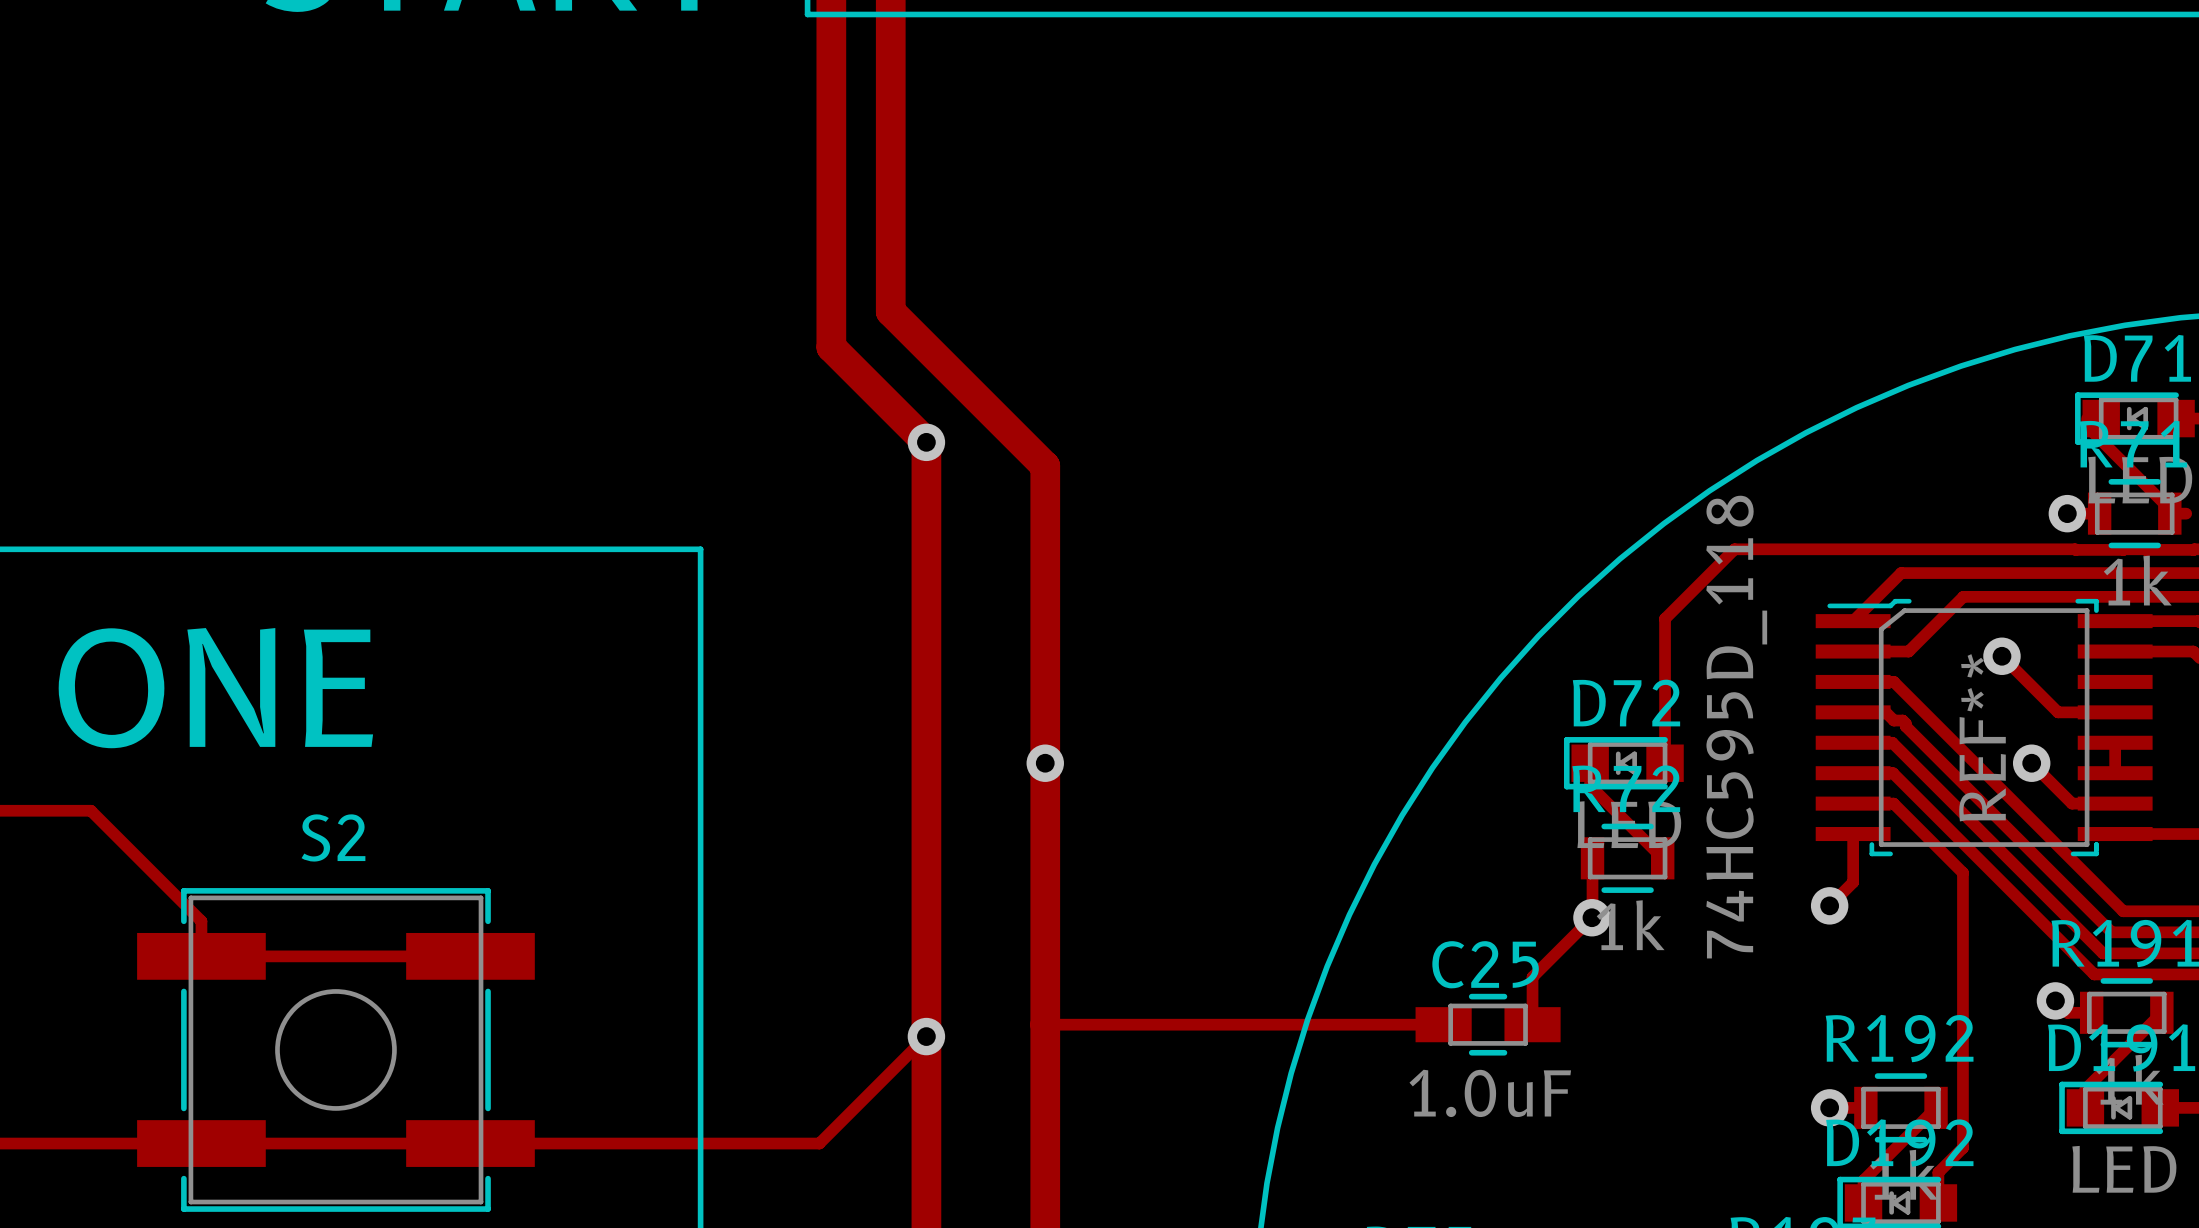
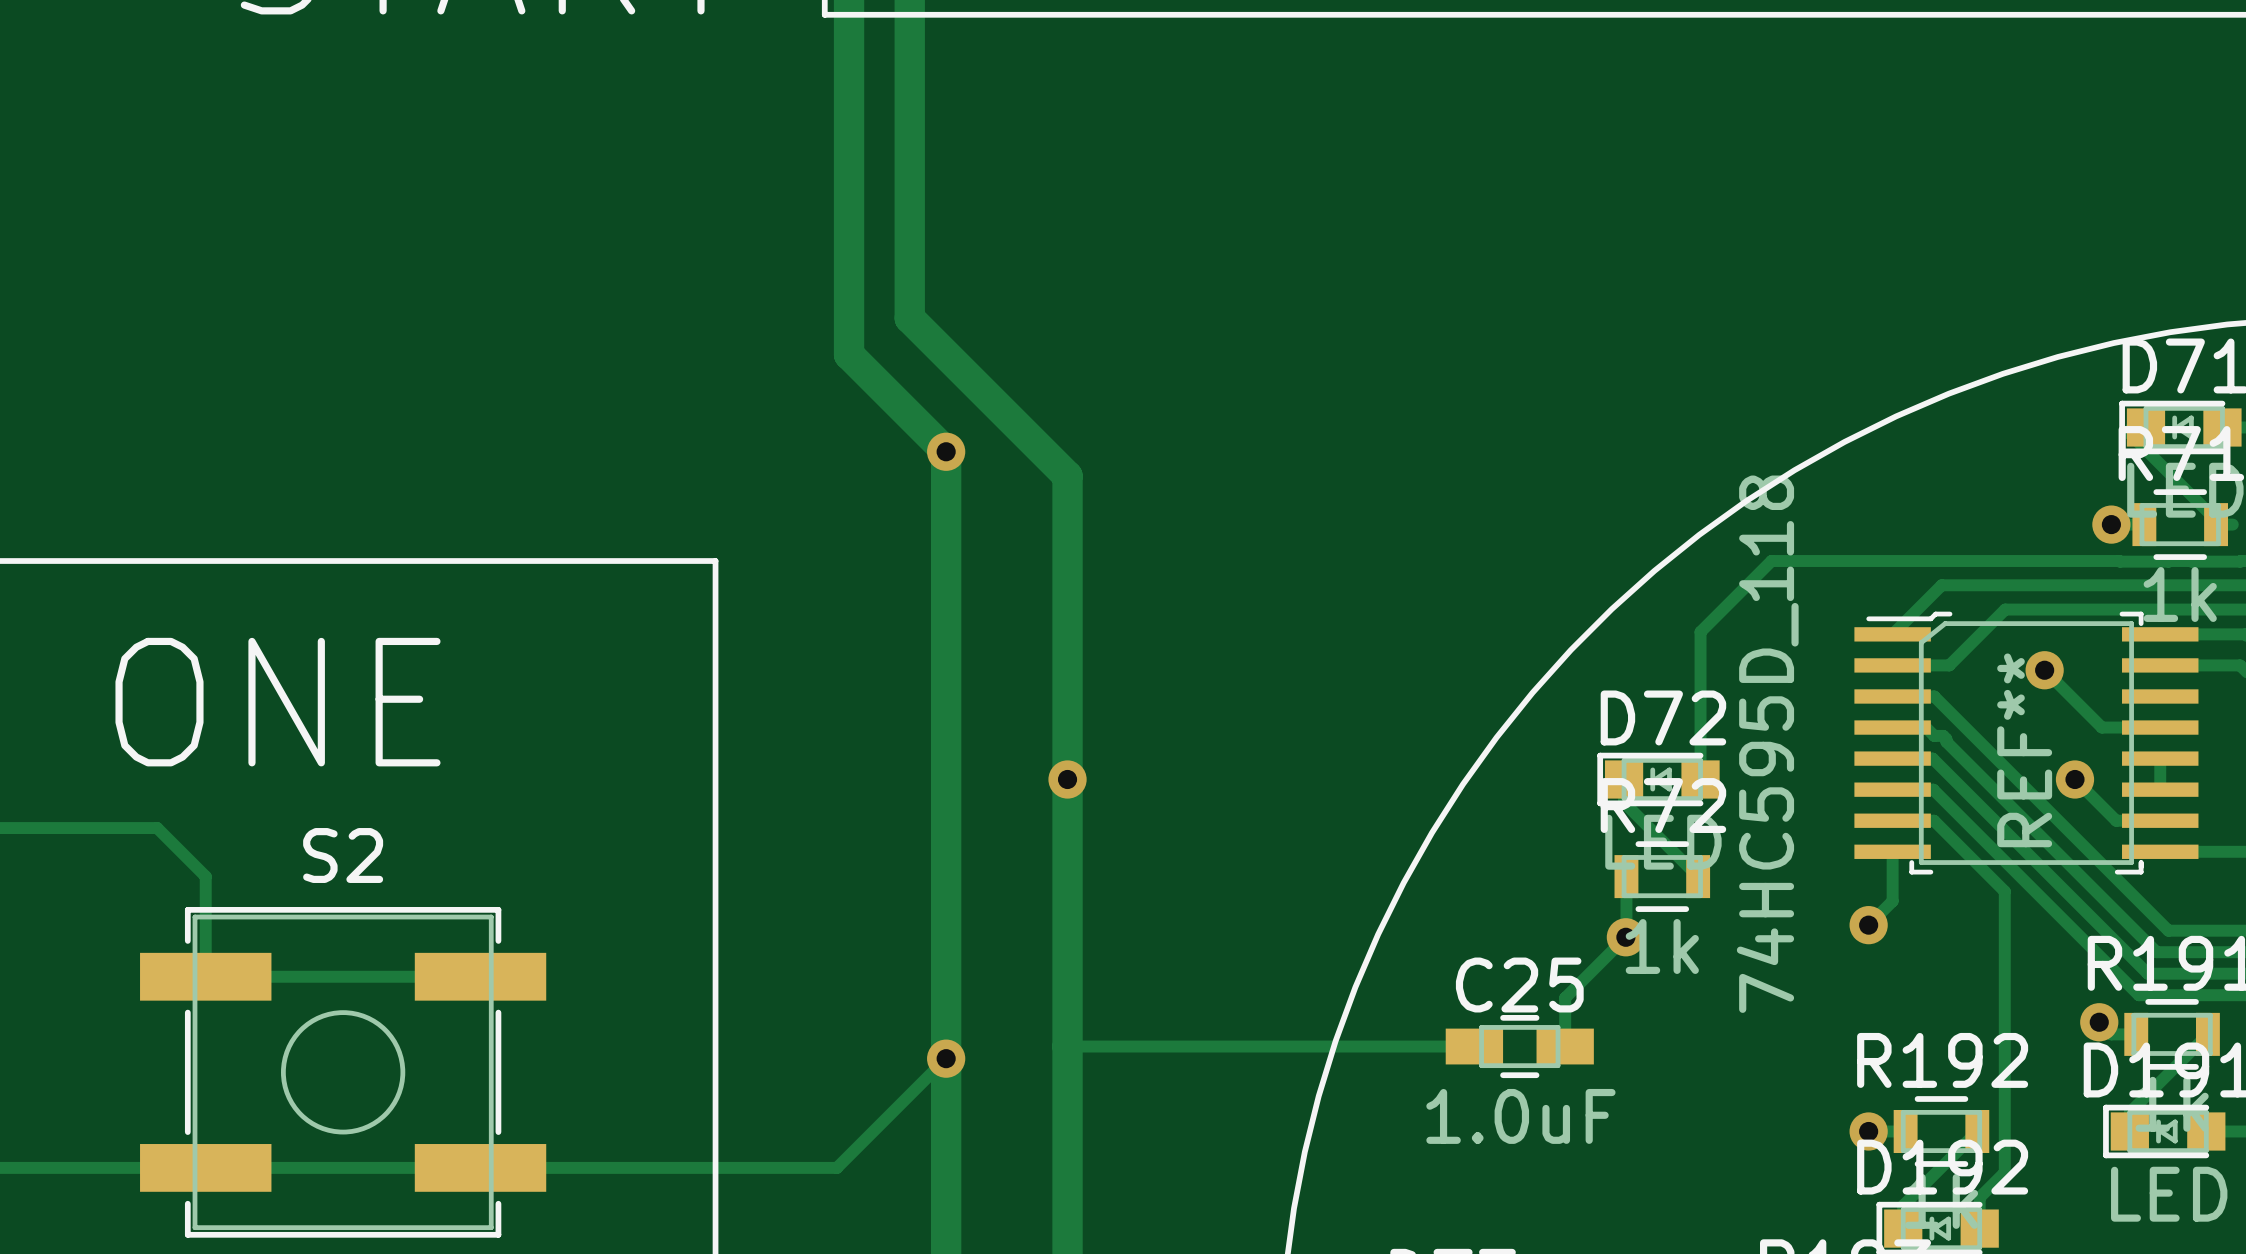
track: (90, 810) (201, 921) -> (92, 828) (157, 828) (205, 876) (205, 940)

